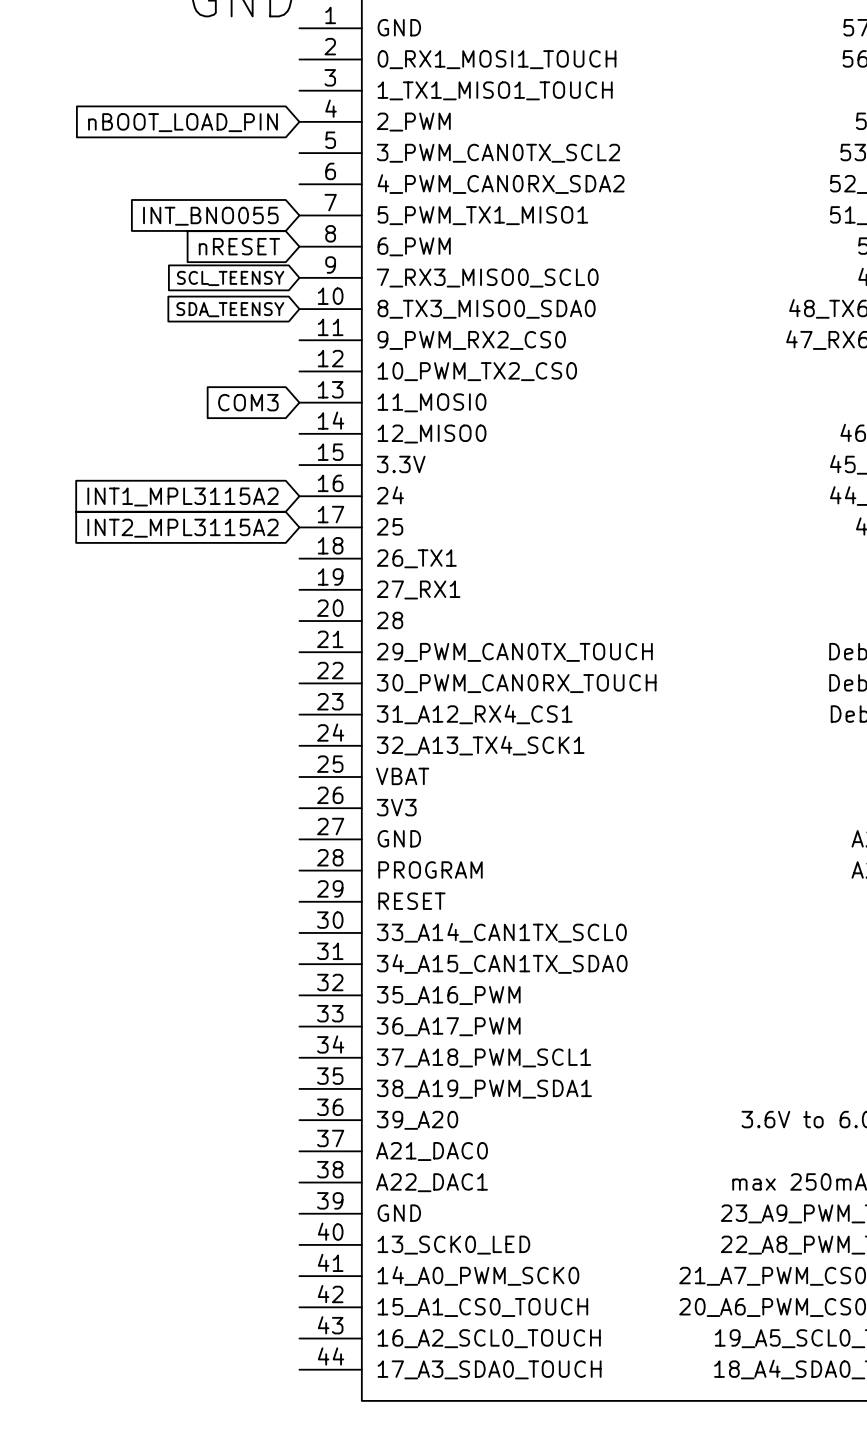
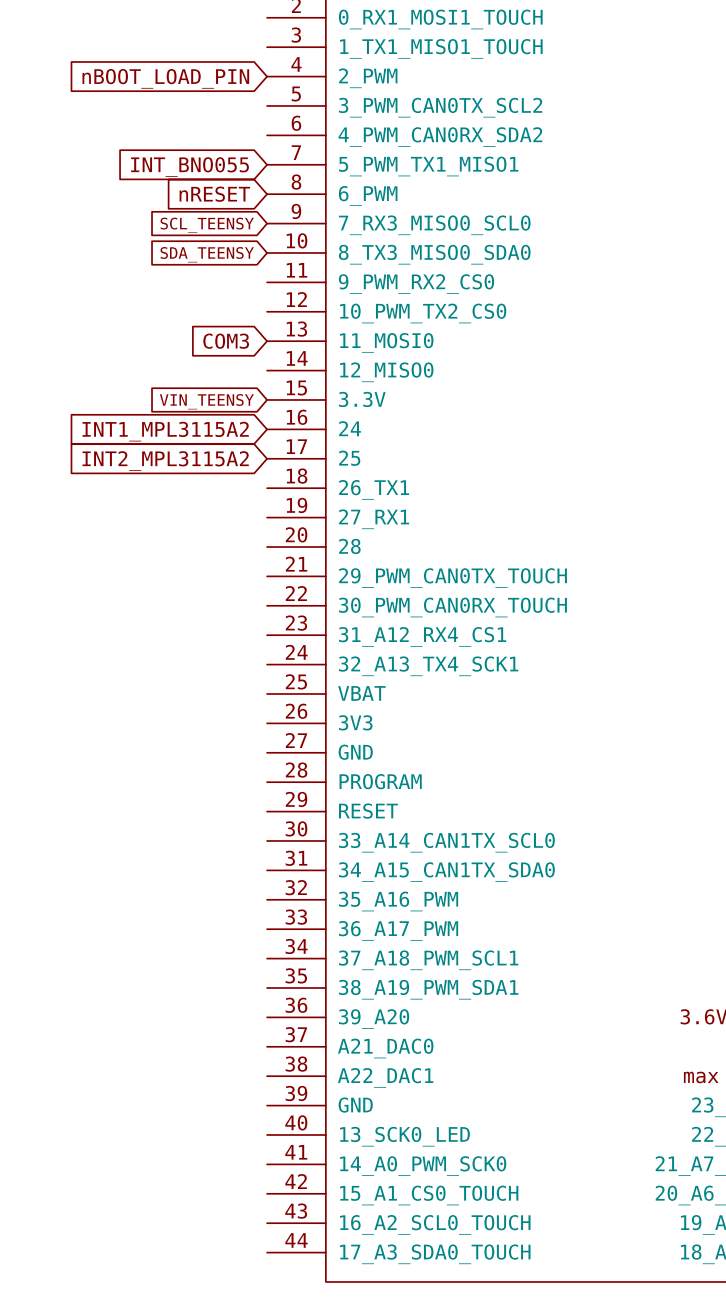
global label: none -> VIN_TEENSY (206, 401)

